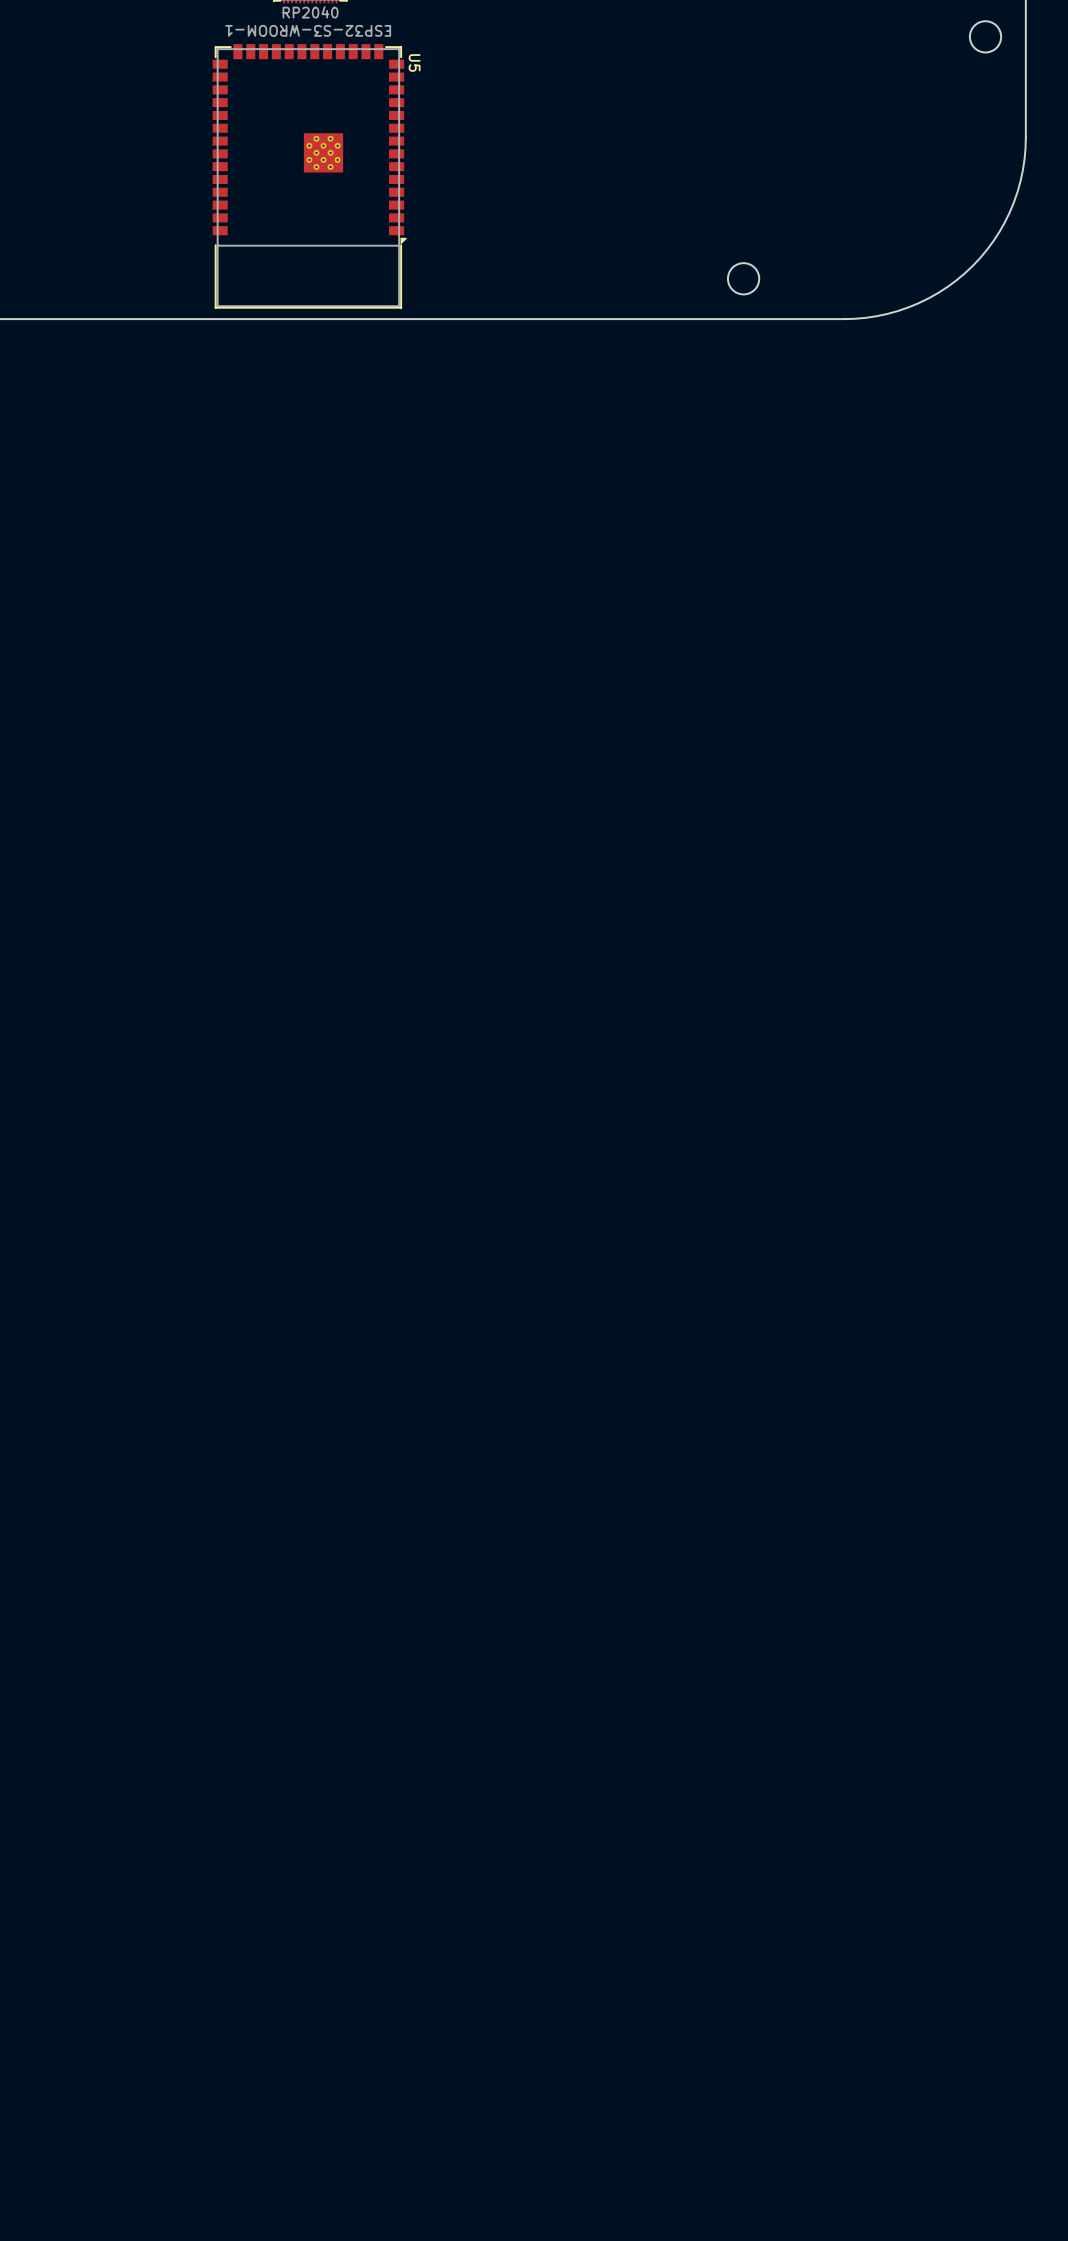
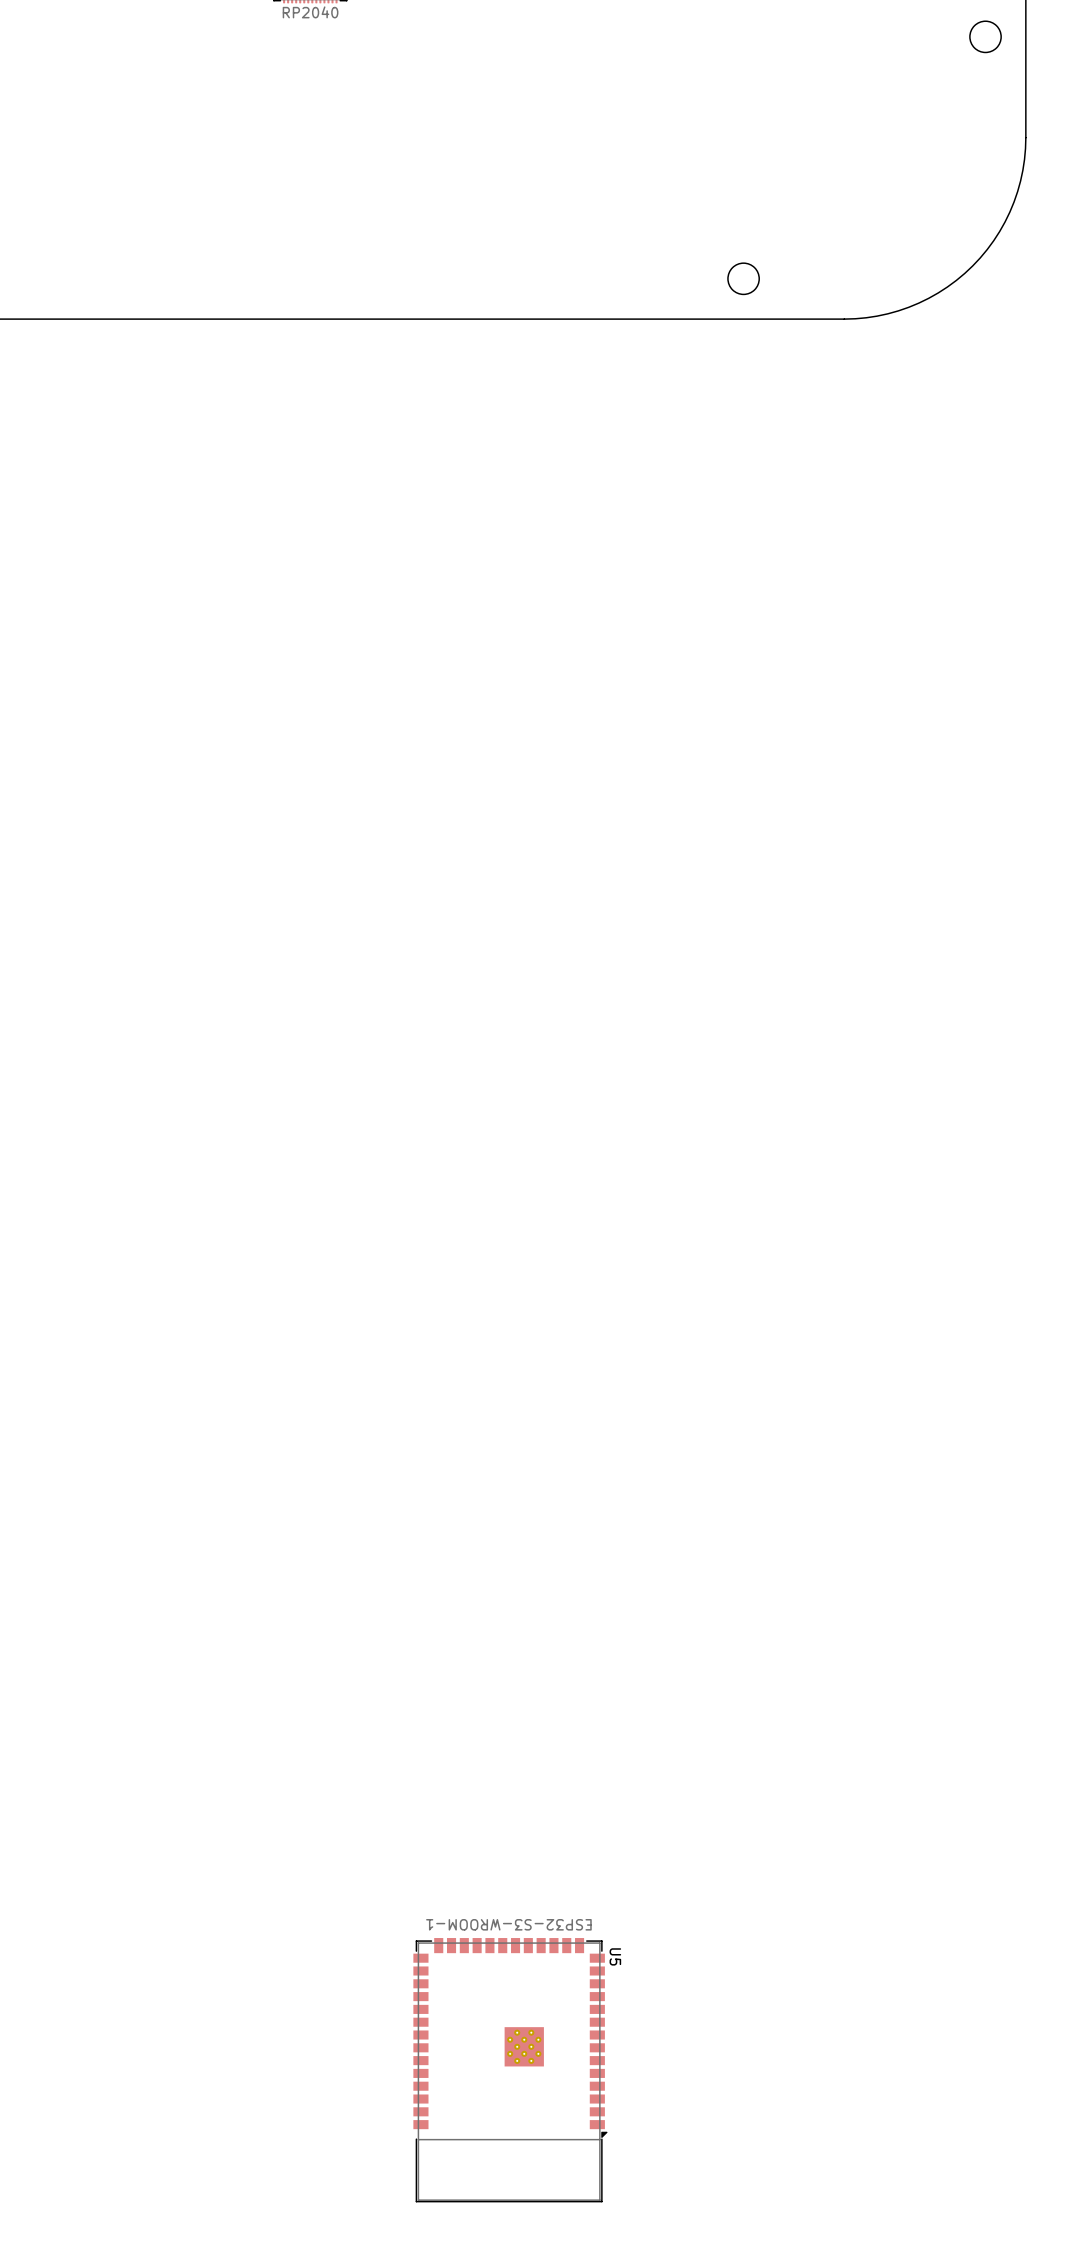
U5 position: (309, 176) -> (510, 2070)

